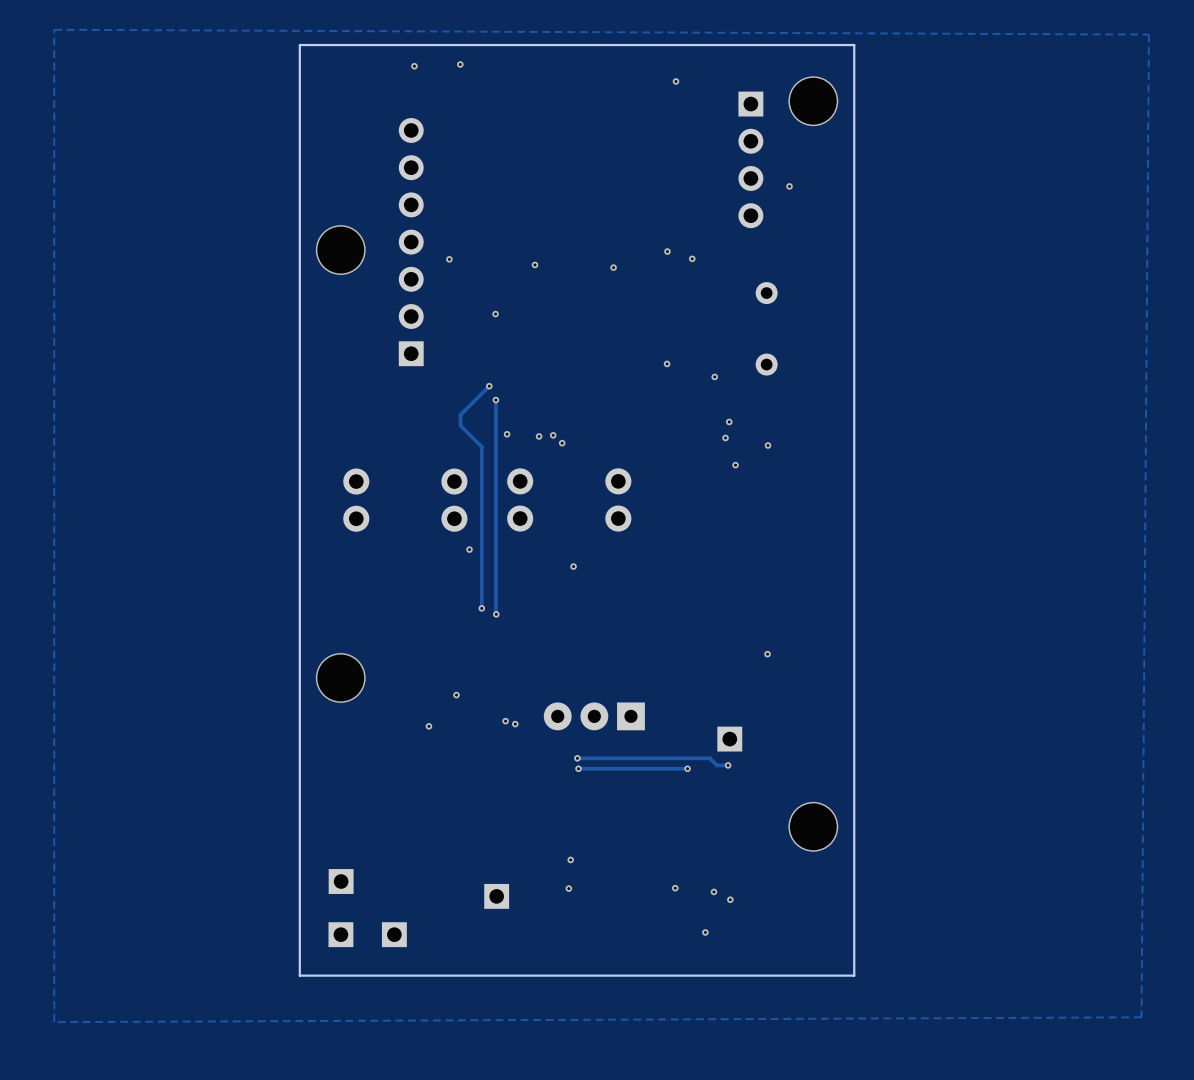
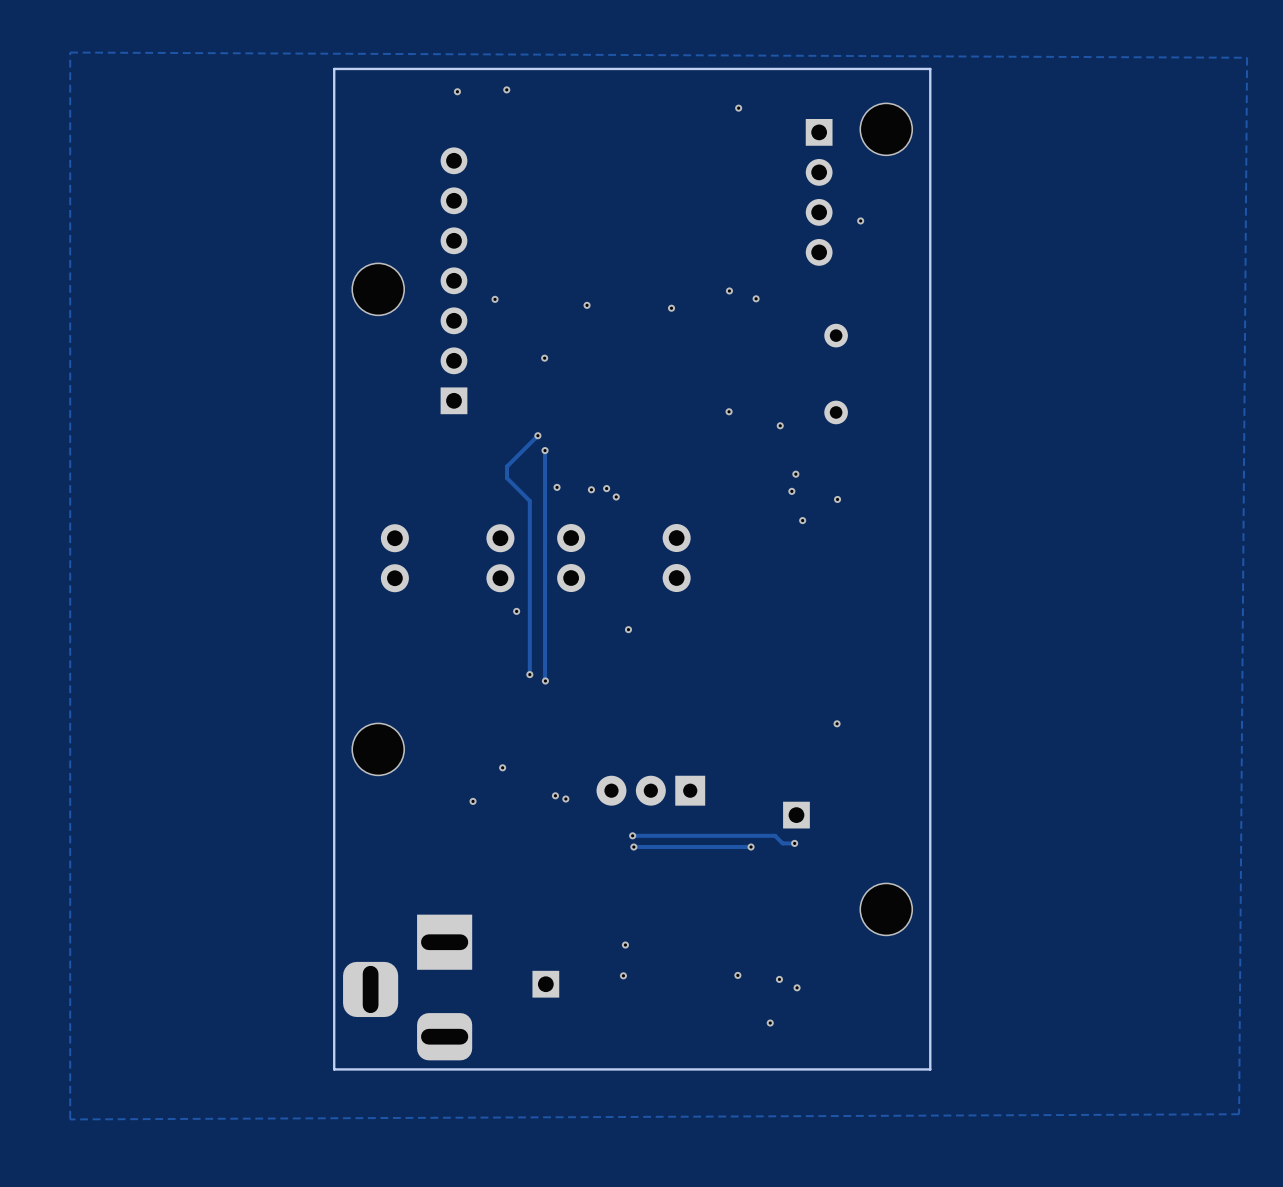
part: (341, 881) -> none
part: none -> (407, 987)
part: (340, 934) -> none
part: (394, 934) -> none

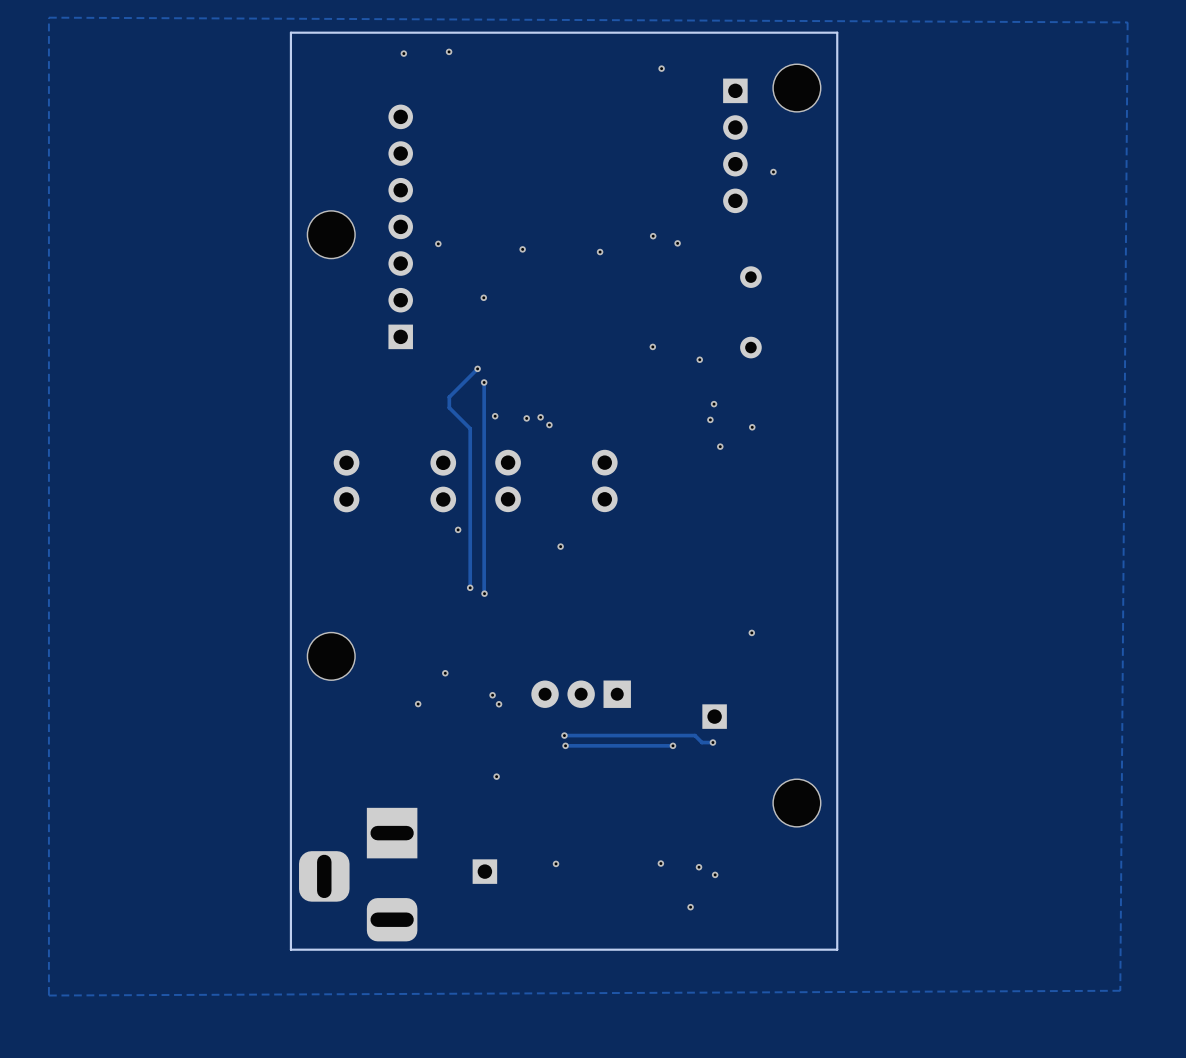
via: none -> (492, 695)
via: (555, 795) -> none
via: (565, 799) -> none
via: none -> (499, 704)
via: none -> (496, 776)
via: (625, 945) -> none

